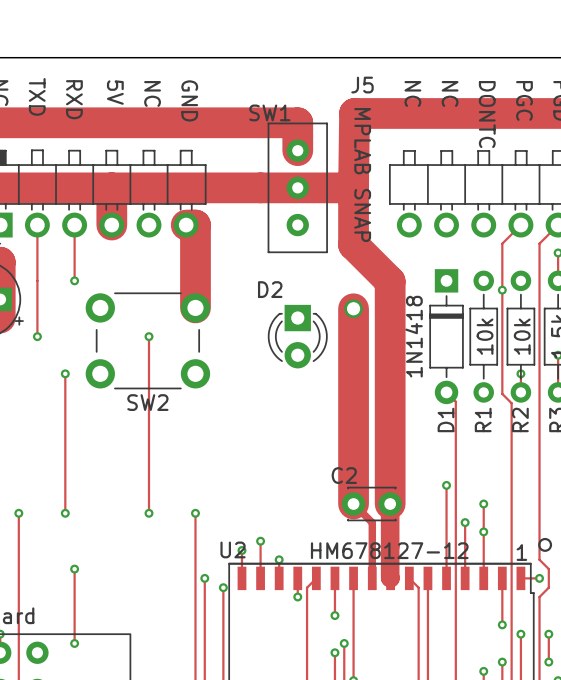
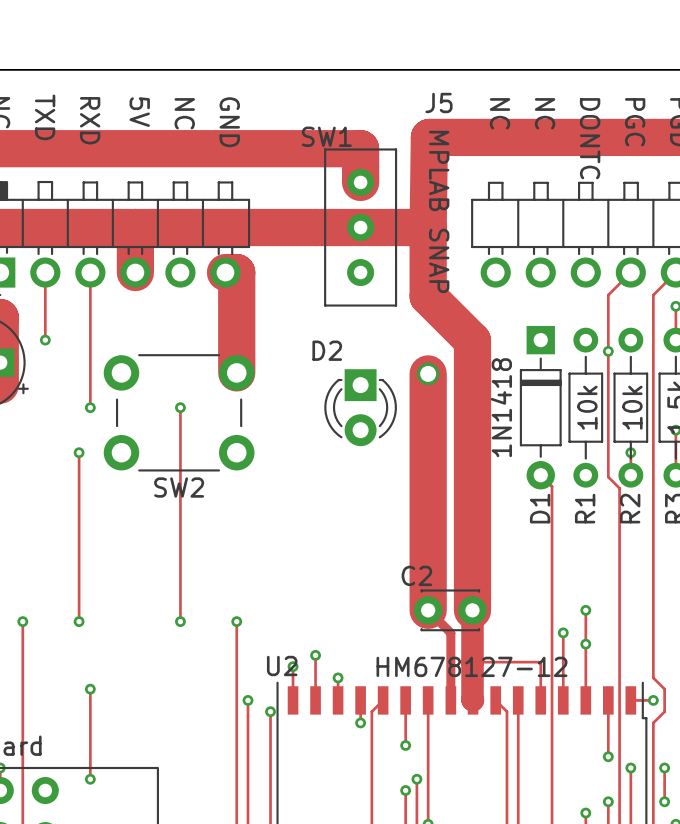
track: (37, 280) (37, 336) -> (90, 340) (90, 407)
via: none -> (45, 340)
via: (74, 280) -> none
via: (37, 336) -> none
via: none -> (90, 407)
track: (446, 485) (446, 548) -> (472, 662) (538, 662) (540, 663)
via: (446, 485) -> none
drawing: [538, 537, 553, 552] -> none
text: 1 (521, 552) -> none
line: (229, 563) (530, 563) -> none

